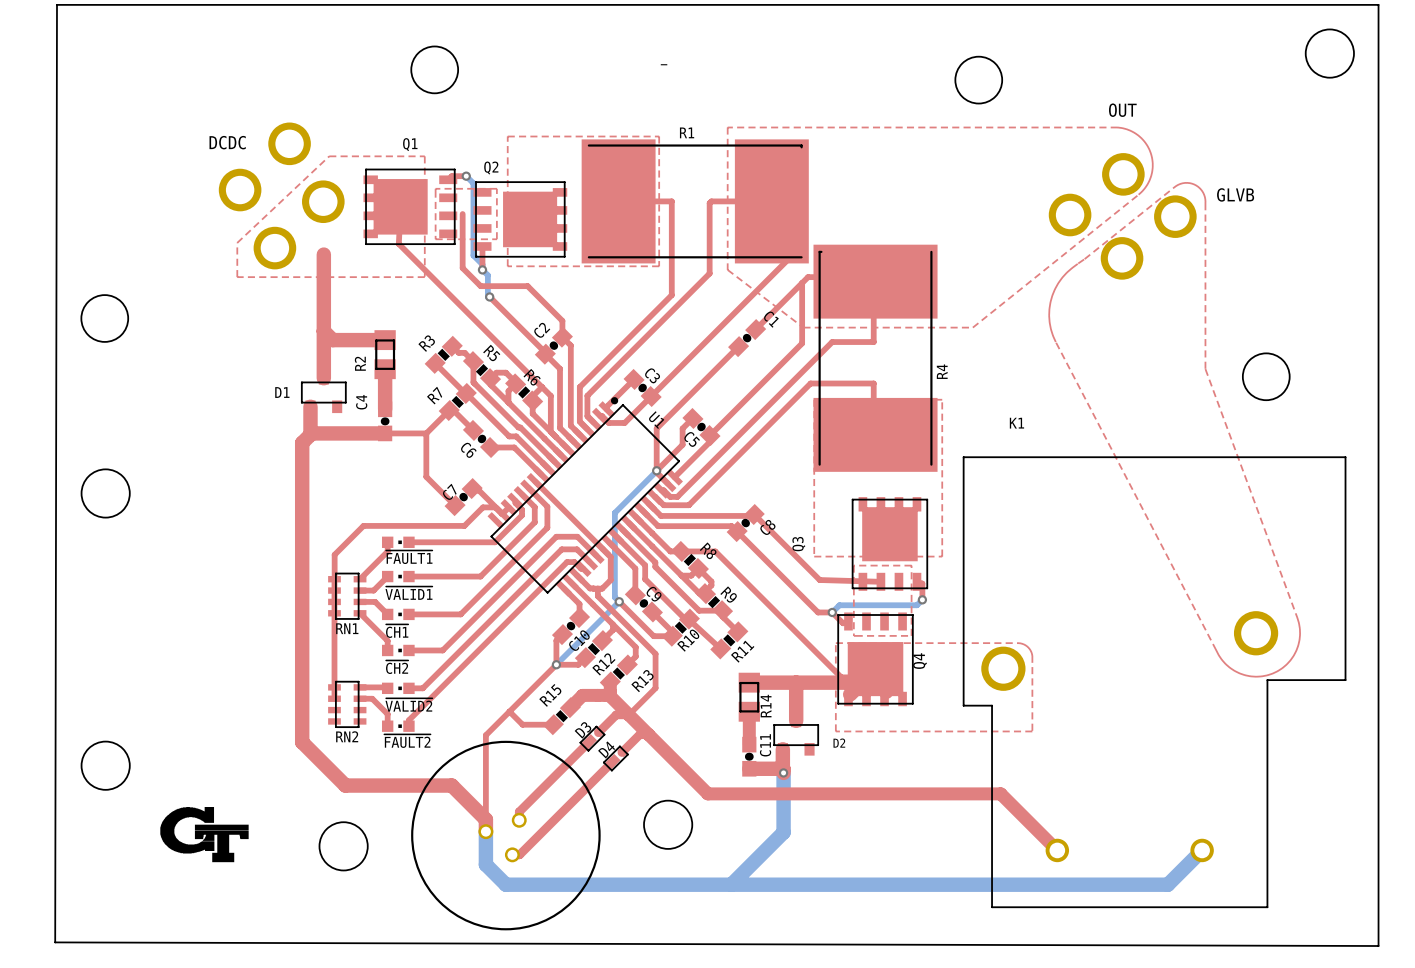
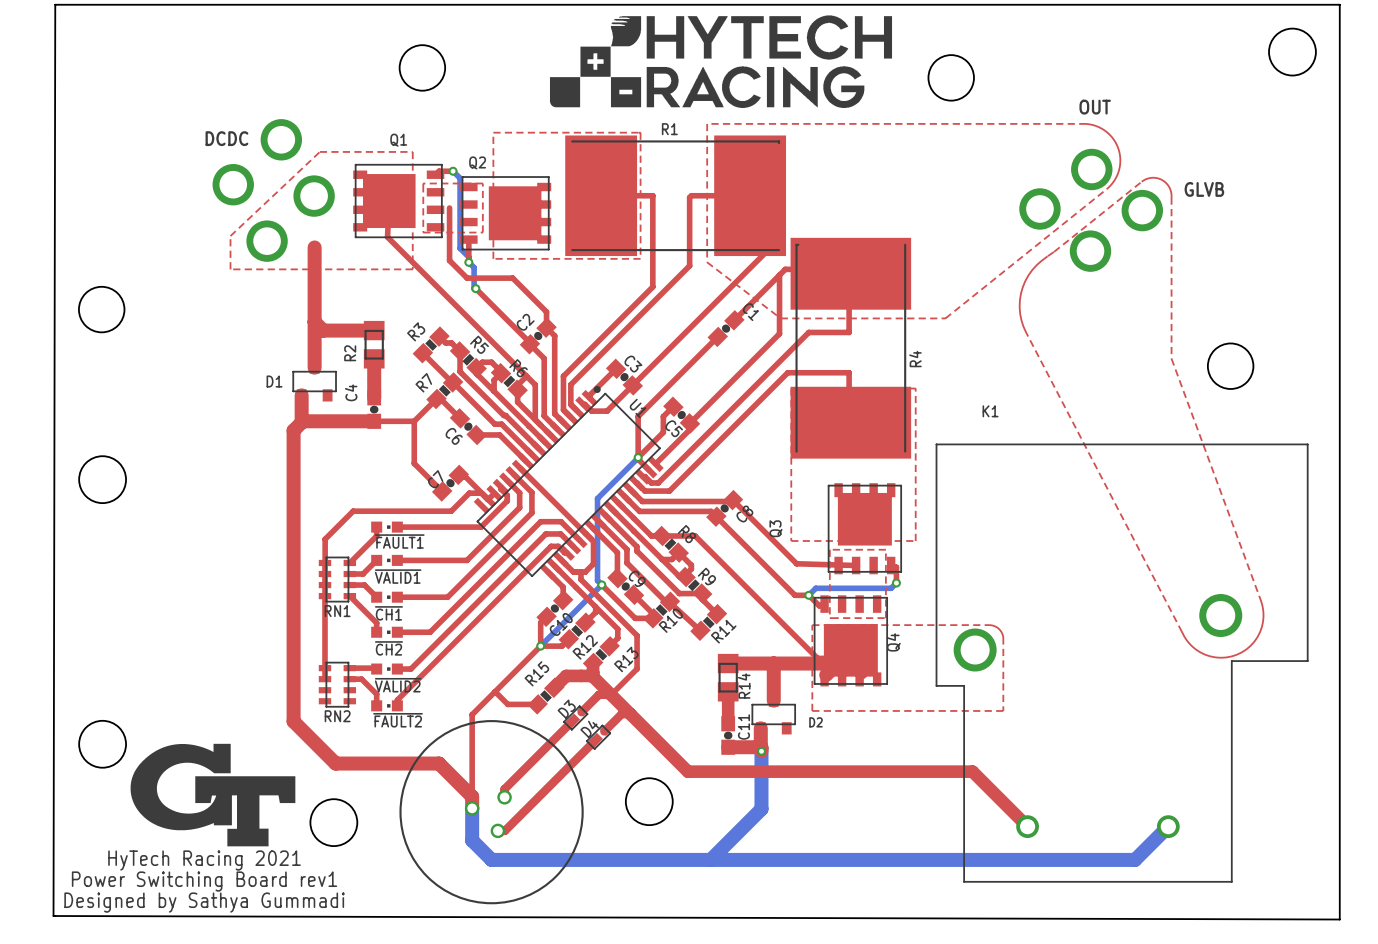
drawing: none -> [549, 15, 893, 108]
drawing: [660, 64, 668, 66] -> none
drawing: none -> [130, 743, 296, 847]
drawing: [160, 807, 249, 863] -> none
text: none -> HyTech Racing 2021 (204, 860)
text: none -> Power Switching Board rev1 (204, 881)
text: none -> Designed by Sathya Gummadi (204, 902)

